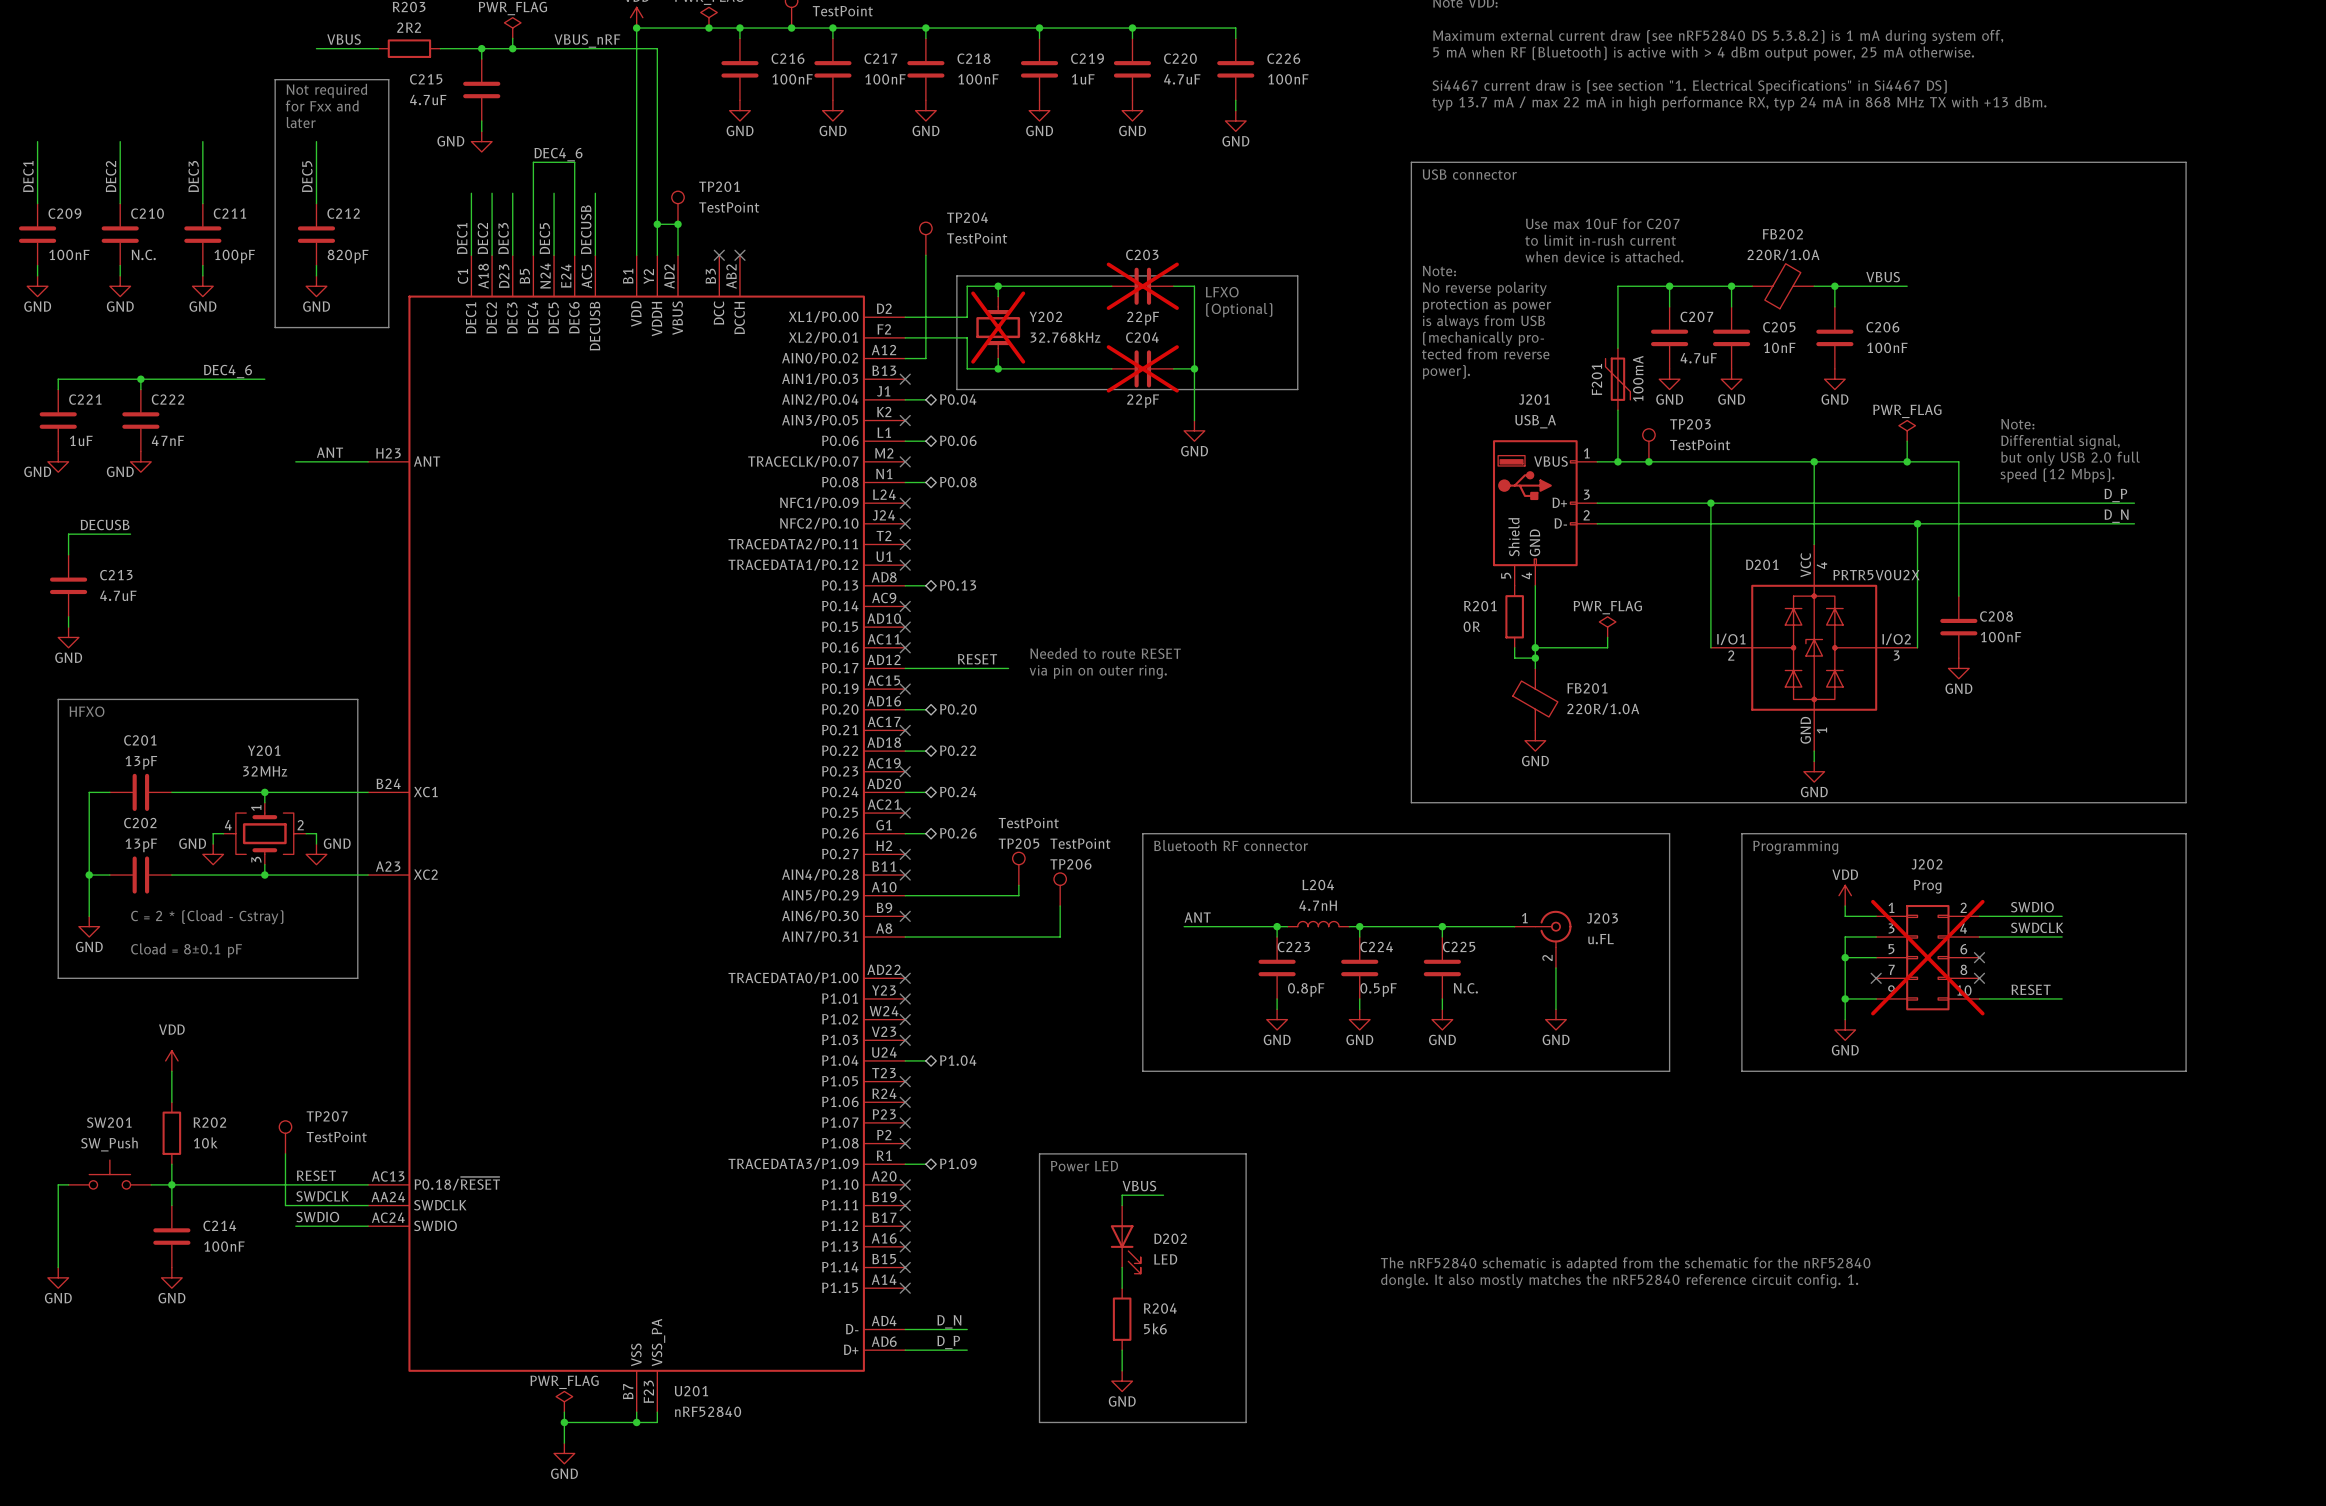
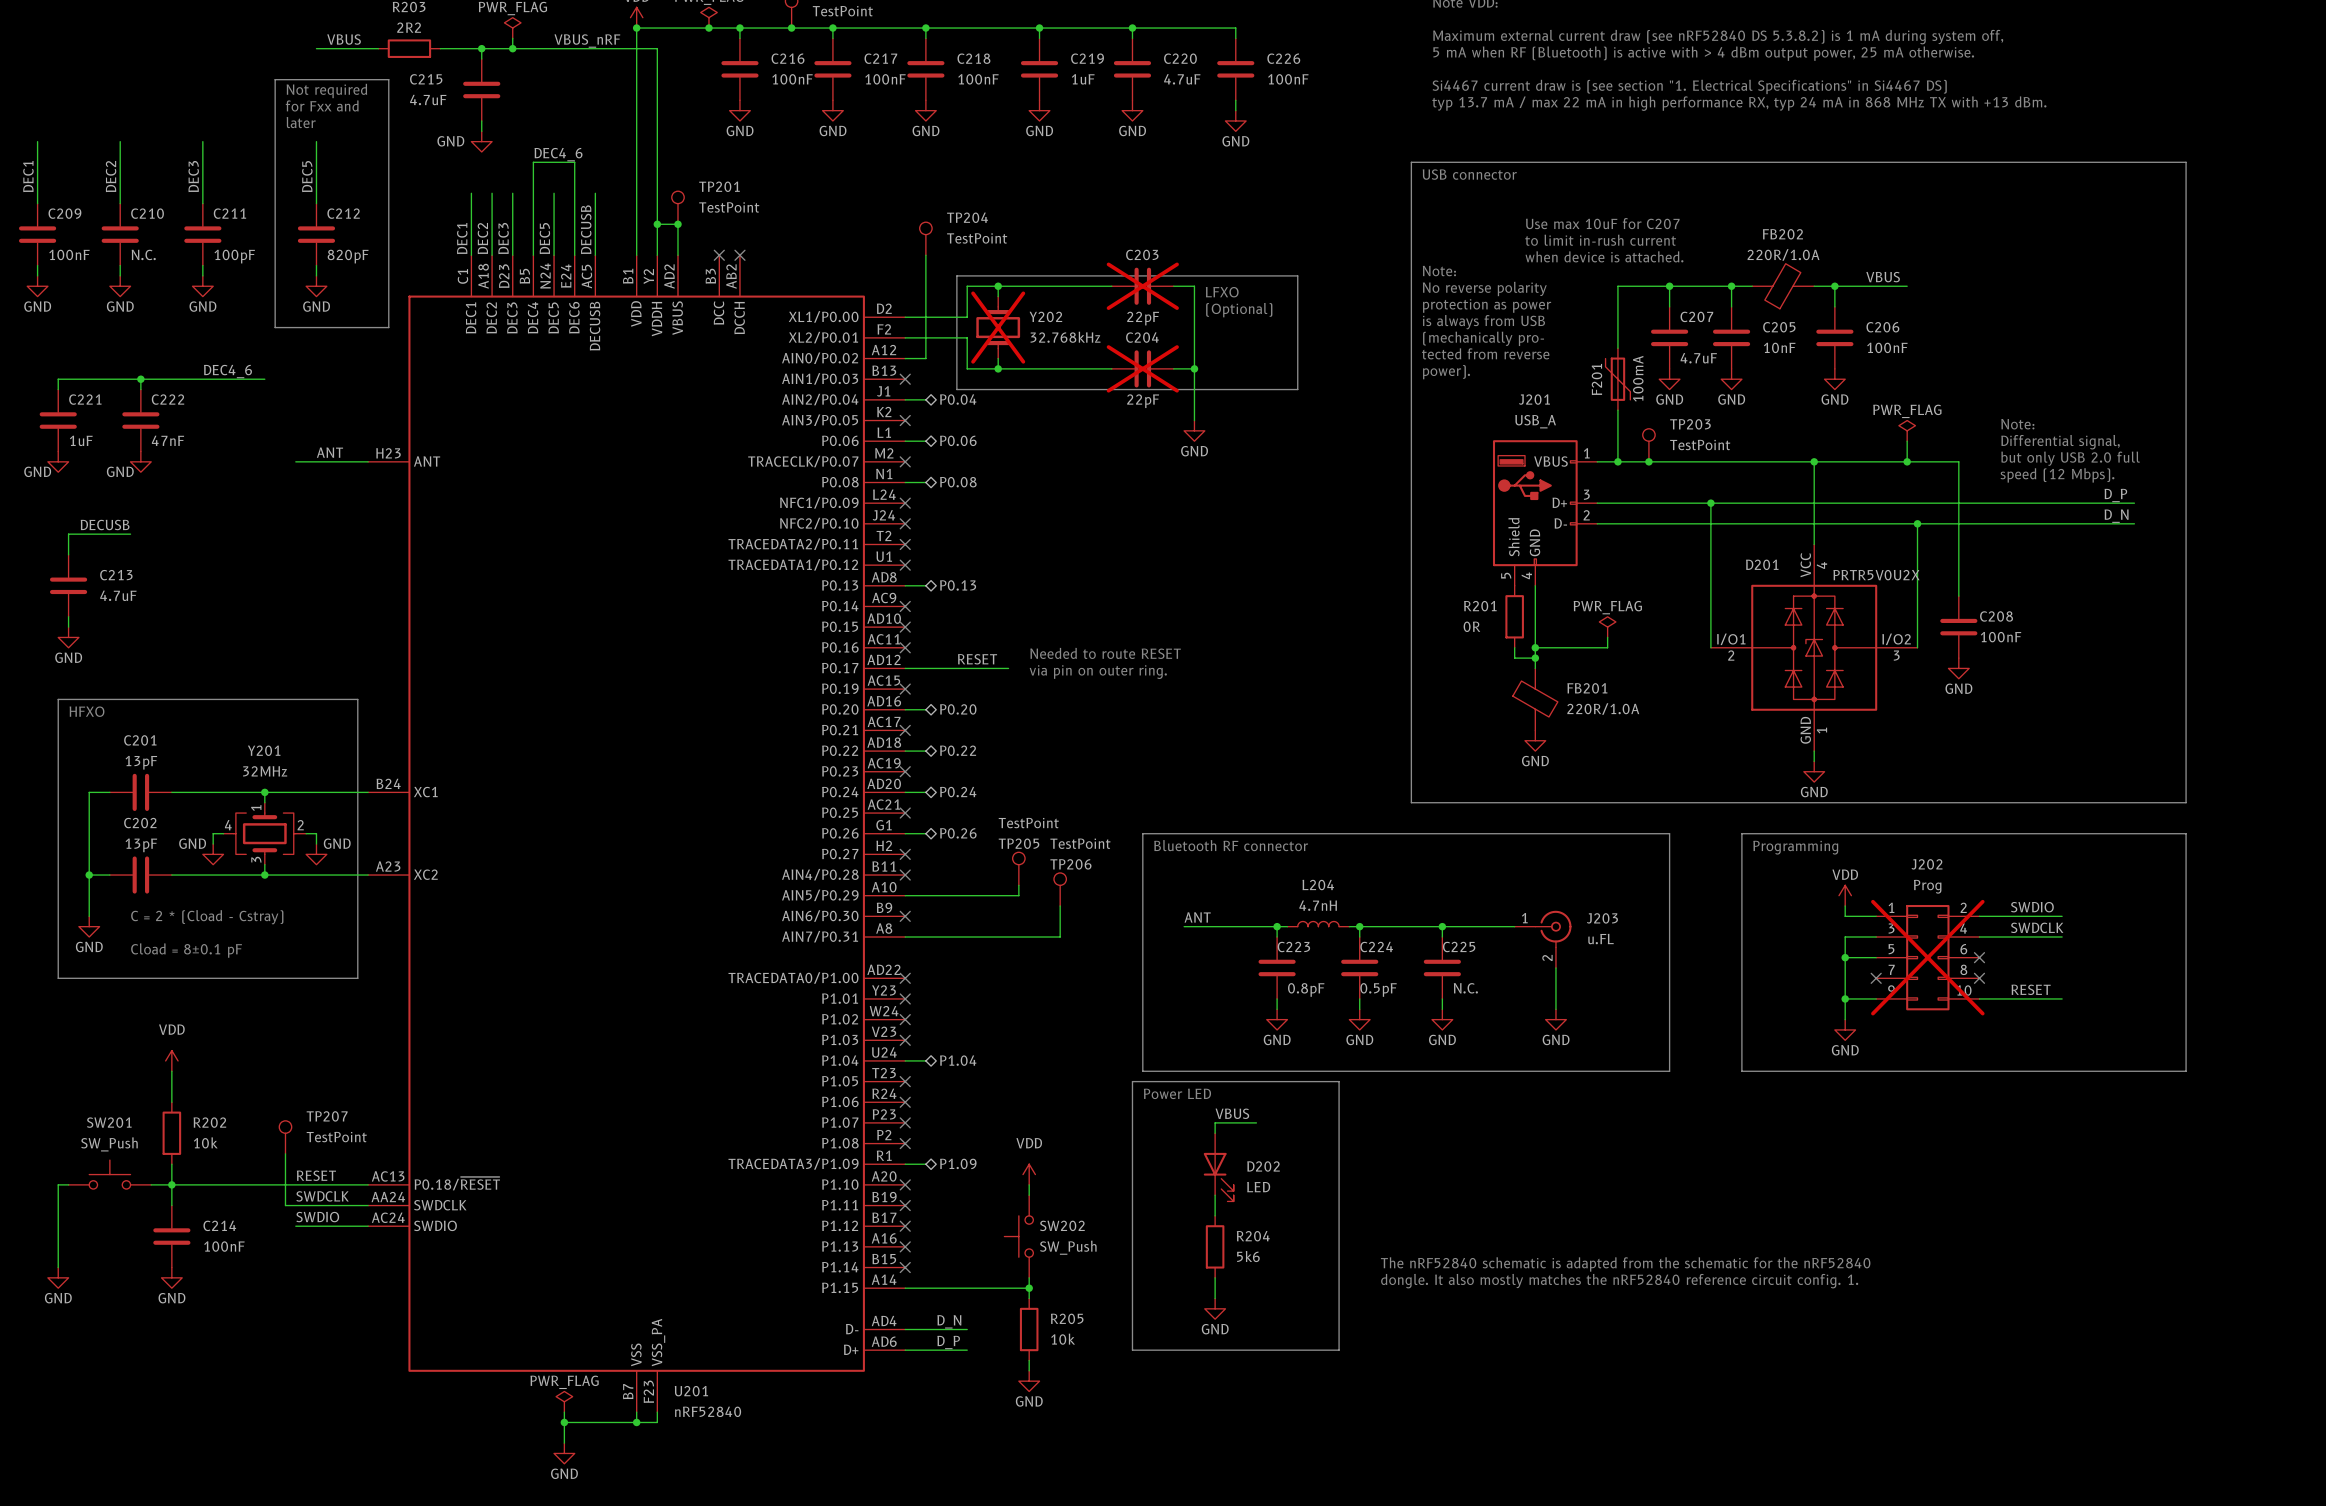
line: (1039, 1153) (1039, 1422) (1246, 1422) (1246, 1153) (1039, 1153) -> (1132, 1081) (1132, 1350) (1339, 1350) (1339, 1081) (1132, 1081)
text position: Power LED (1084, 1166) -> Power LED (1177, 1093)
power symbol: none -> VDD (1029, 1174)
wire: none -> (1029, 1184) (1029, 1195)
label position: VBUS (1139, 1186) -> VBUS (1232, 1113)
wire: (1163, 1195) (1122, 1195) (1122, 1205) -> (1256, 1122) (1215, 1122) (1215, 1133)
SW202: none -> SW_Push (1018, 1236)
D202 position: (1125, 1239) -> (1218, 1167)
wire: (1122, 1267) (1122, 1288) -> (1215, 1195) (1215, 1215)
wire: none -> (1029, 1277) (1029, 1298)
wire: none -> (905, 1288) (1029, 1288)
no-connect mark: (905, 1288) -> none
junction: none -> (1029, 1288)
power symbol: none -> GND (1215, 1308)
R204 position: (1122, 1319) -> (1215, 1246)
R205: none -> 10k (1029, 1329)
wire: (1122, 1350) (1122, 1370) -> (1215, 1277) (1215, 1298)
wire: none -> (1029, 1360) (1029, 1370)
power symbol: none -> GND (1029, 1381)
power symbol: GND (1122, 1381) -> none

